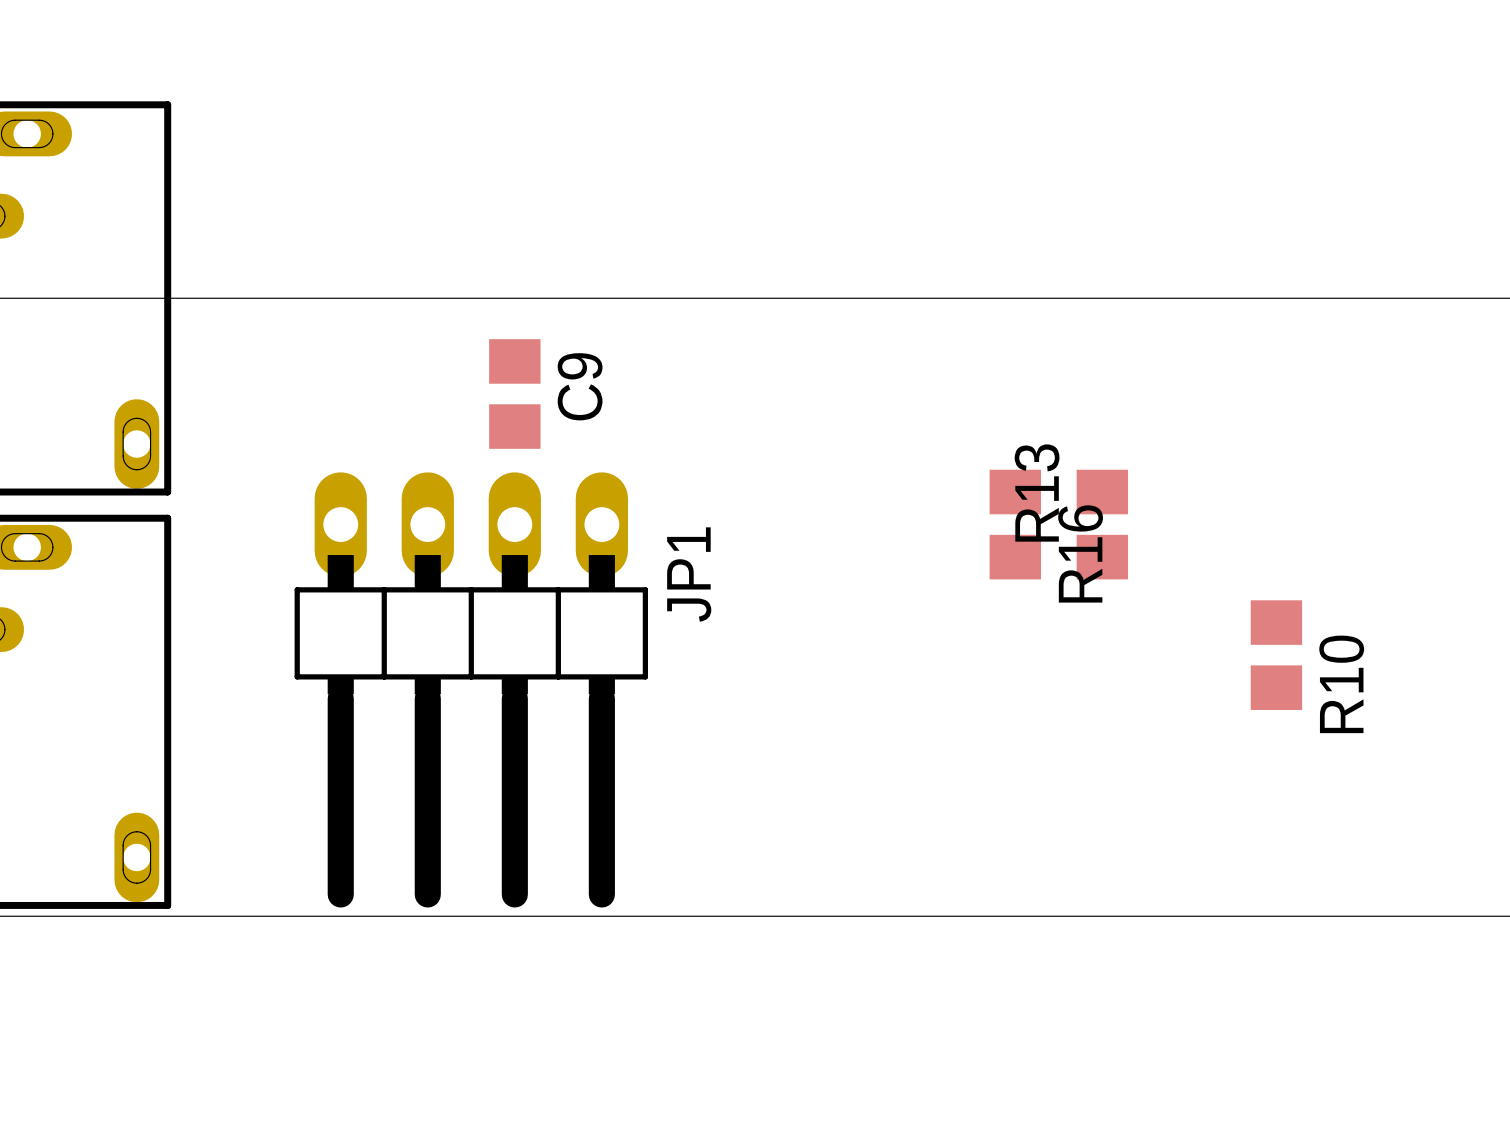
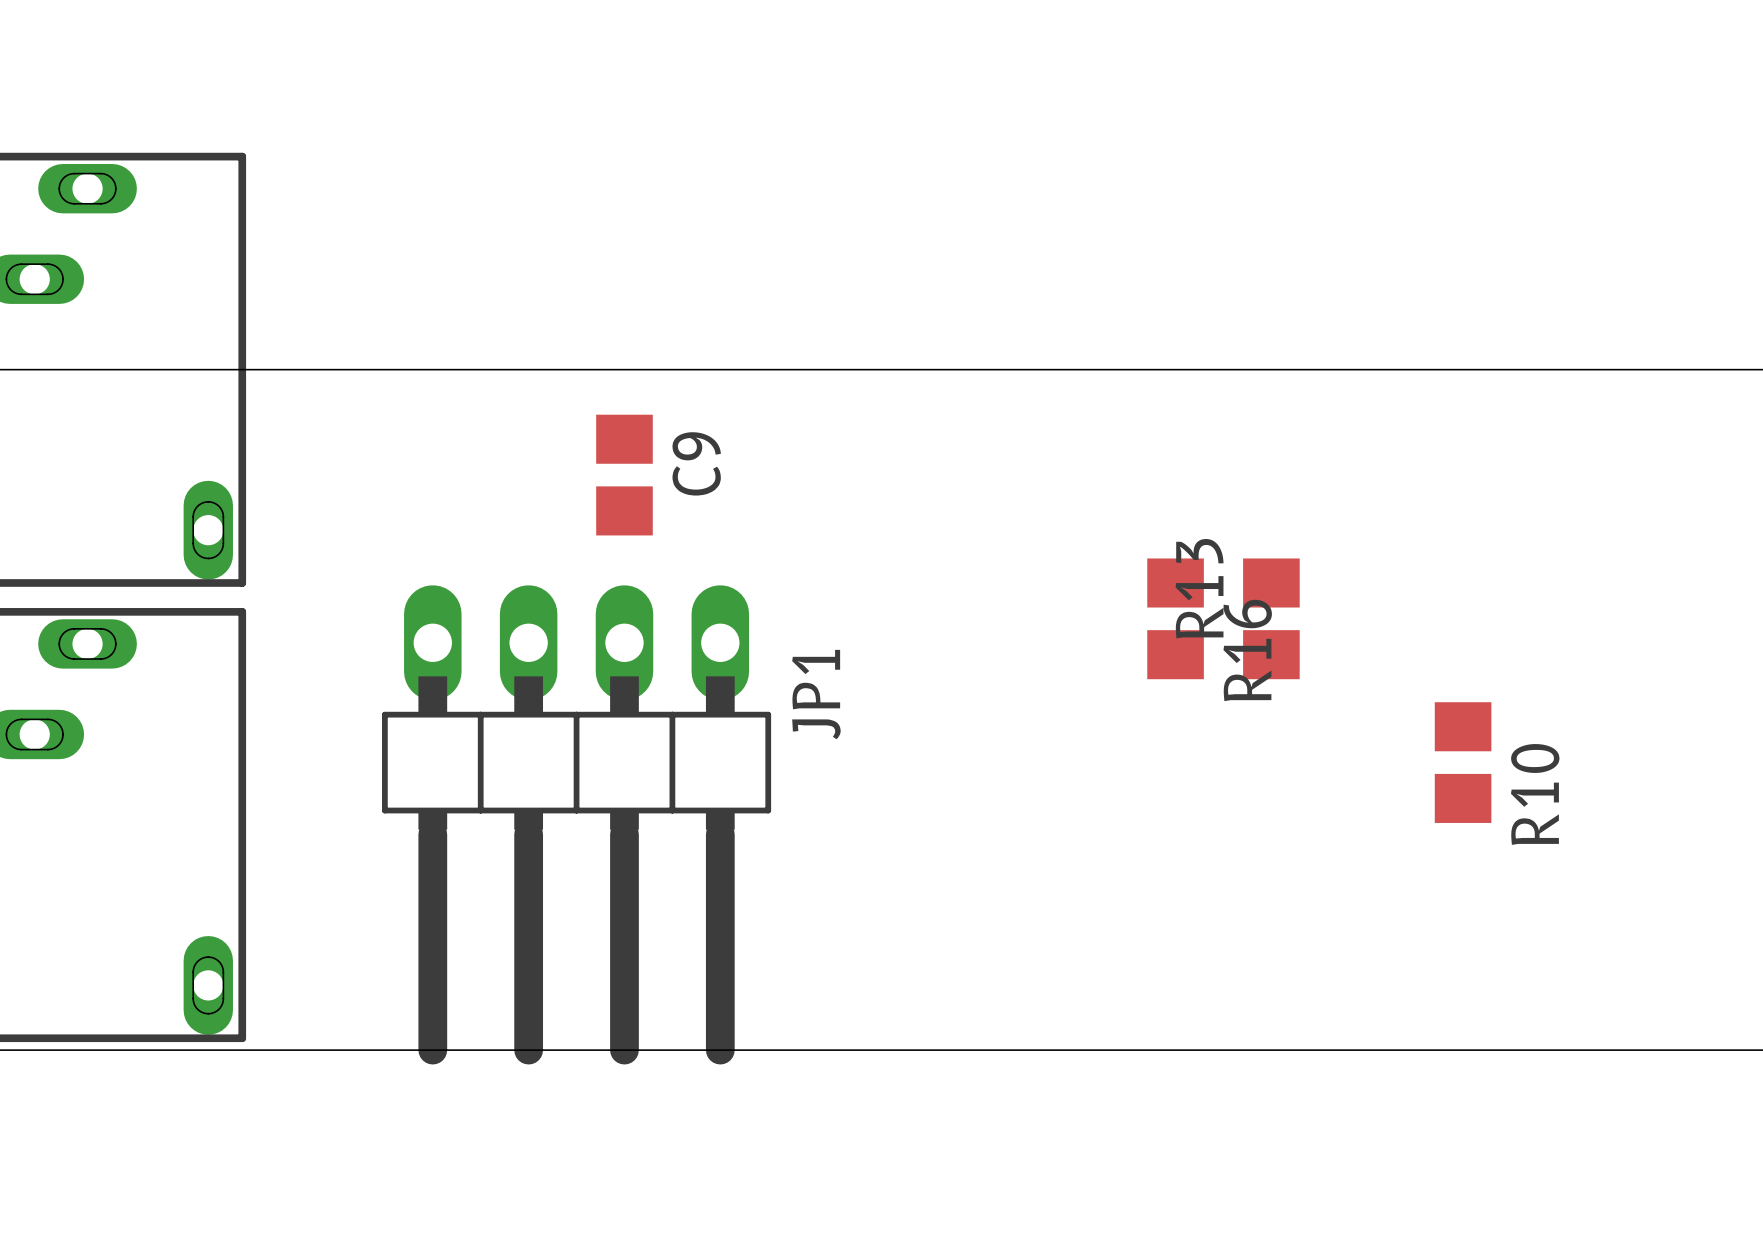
JP1 position: (471, 689) -> (576, 824)

